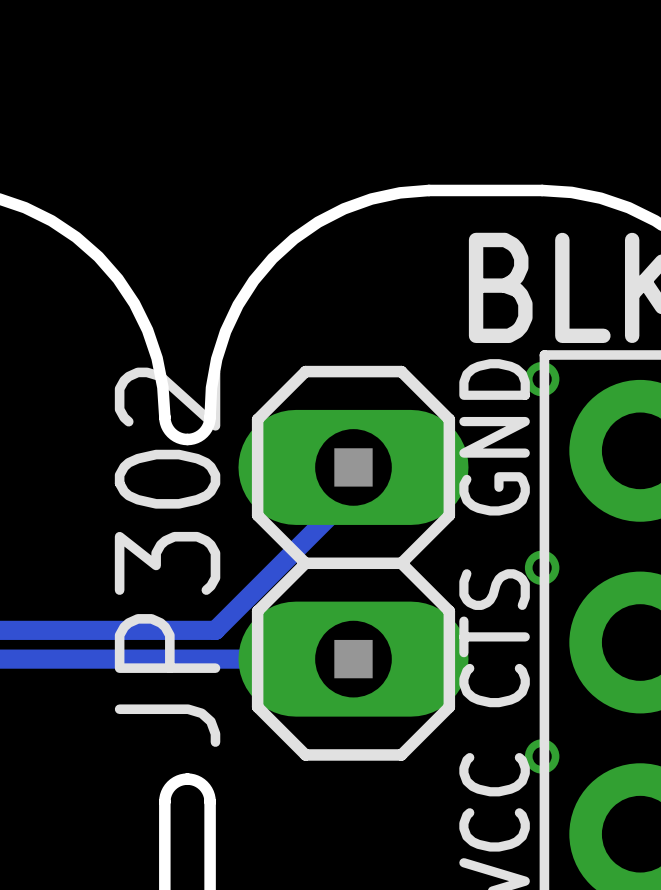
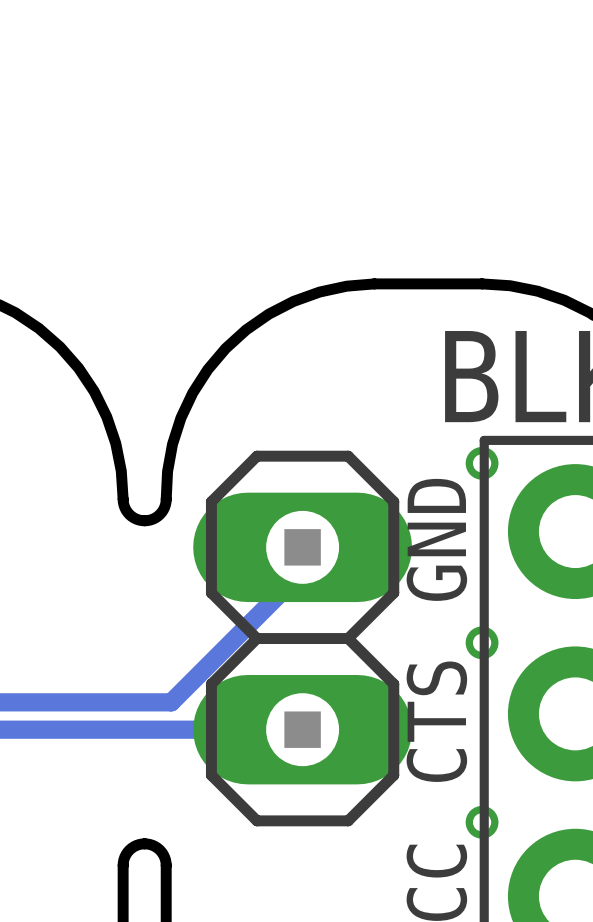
JP302 name: JP302 (167, 557) -> none

